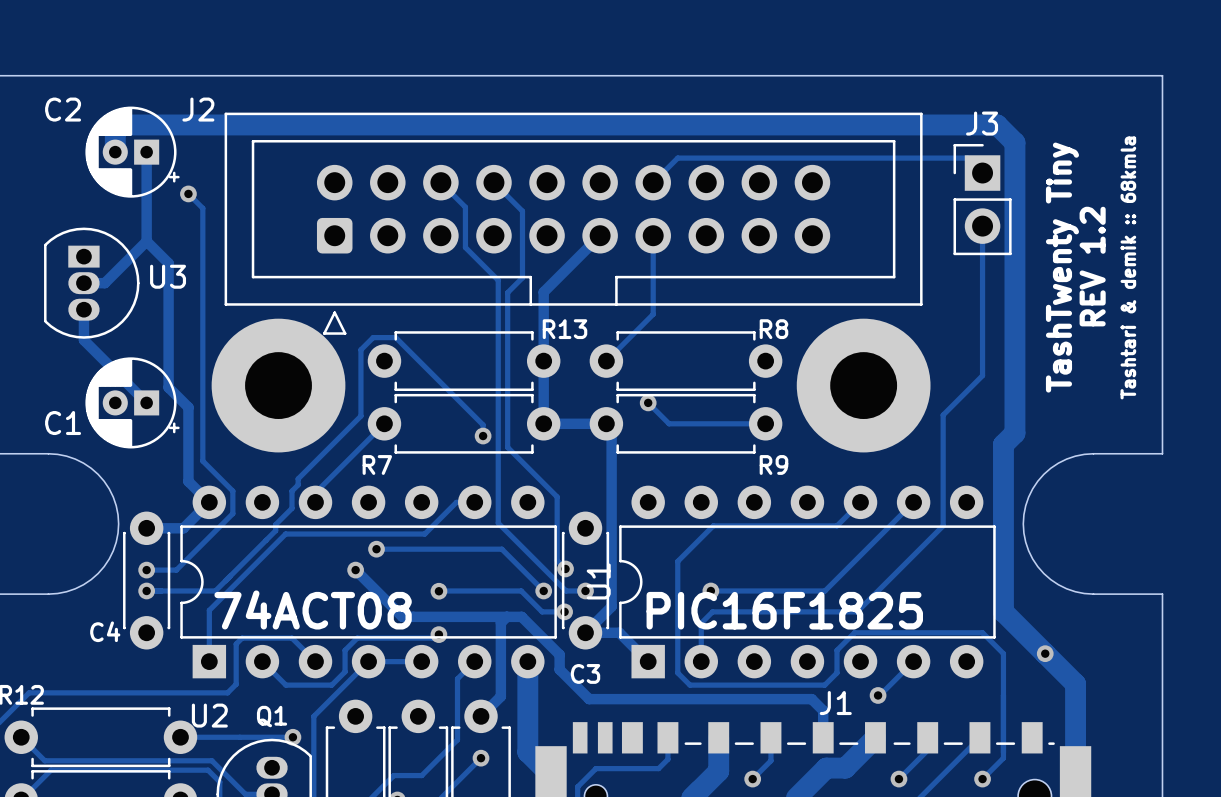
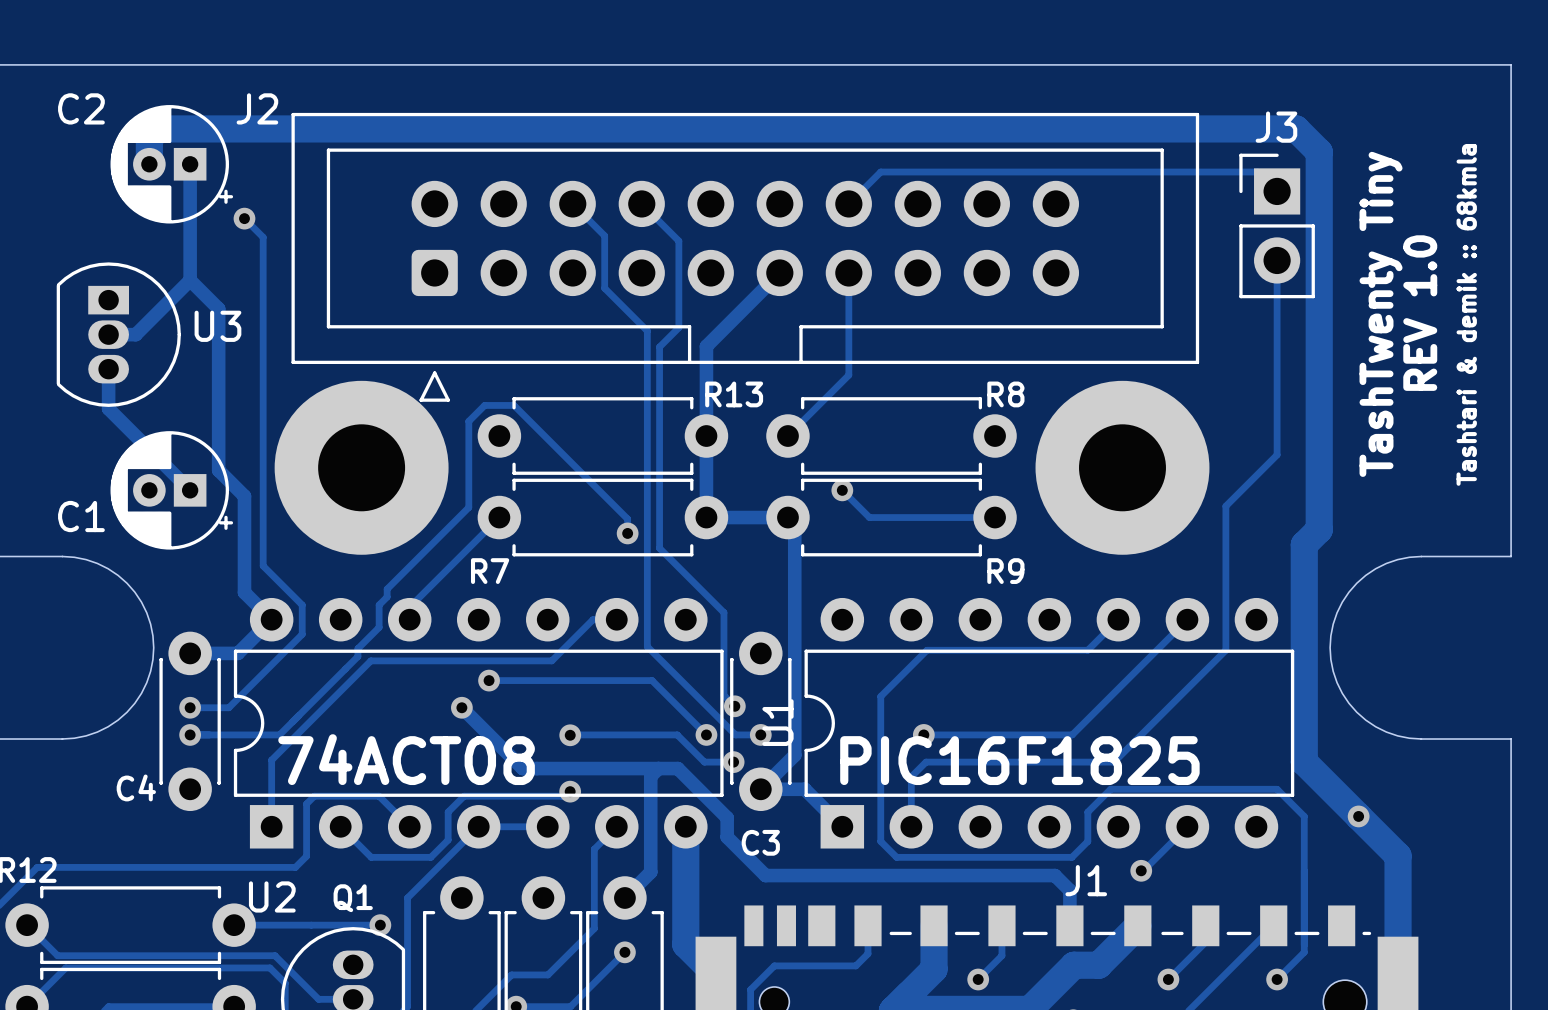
text: REV 1.2 (1092, 266) -> REV 1.0 (1420, 313)

